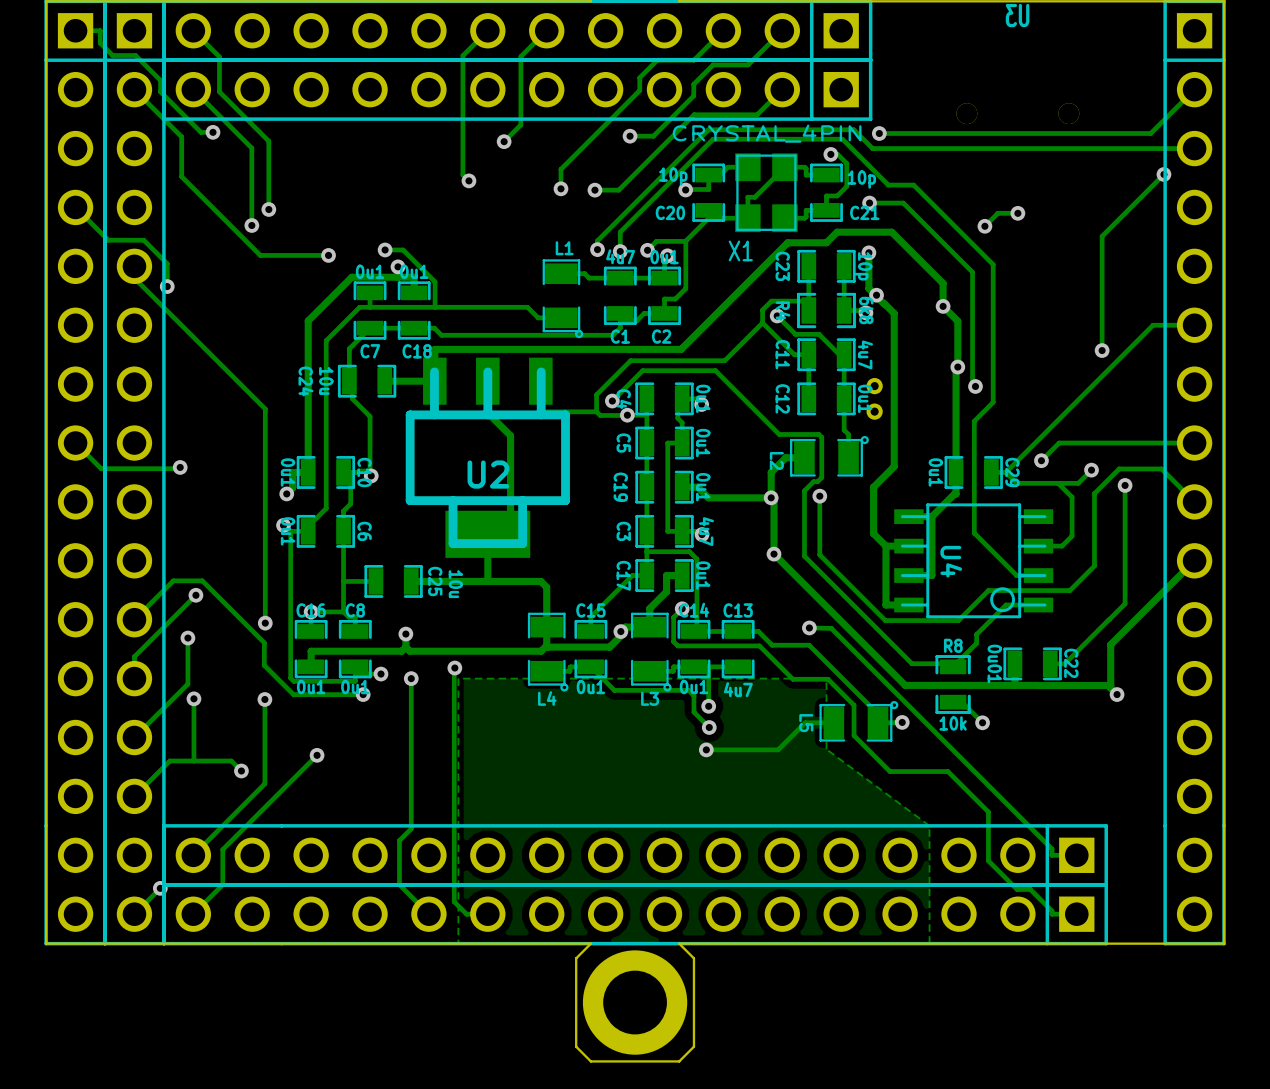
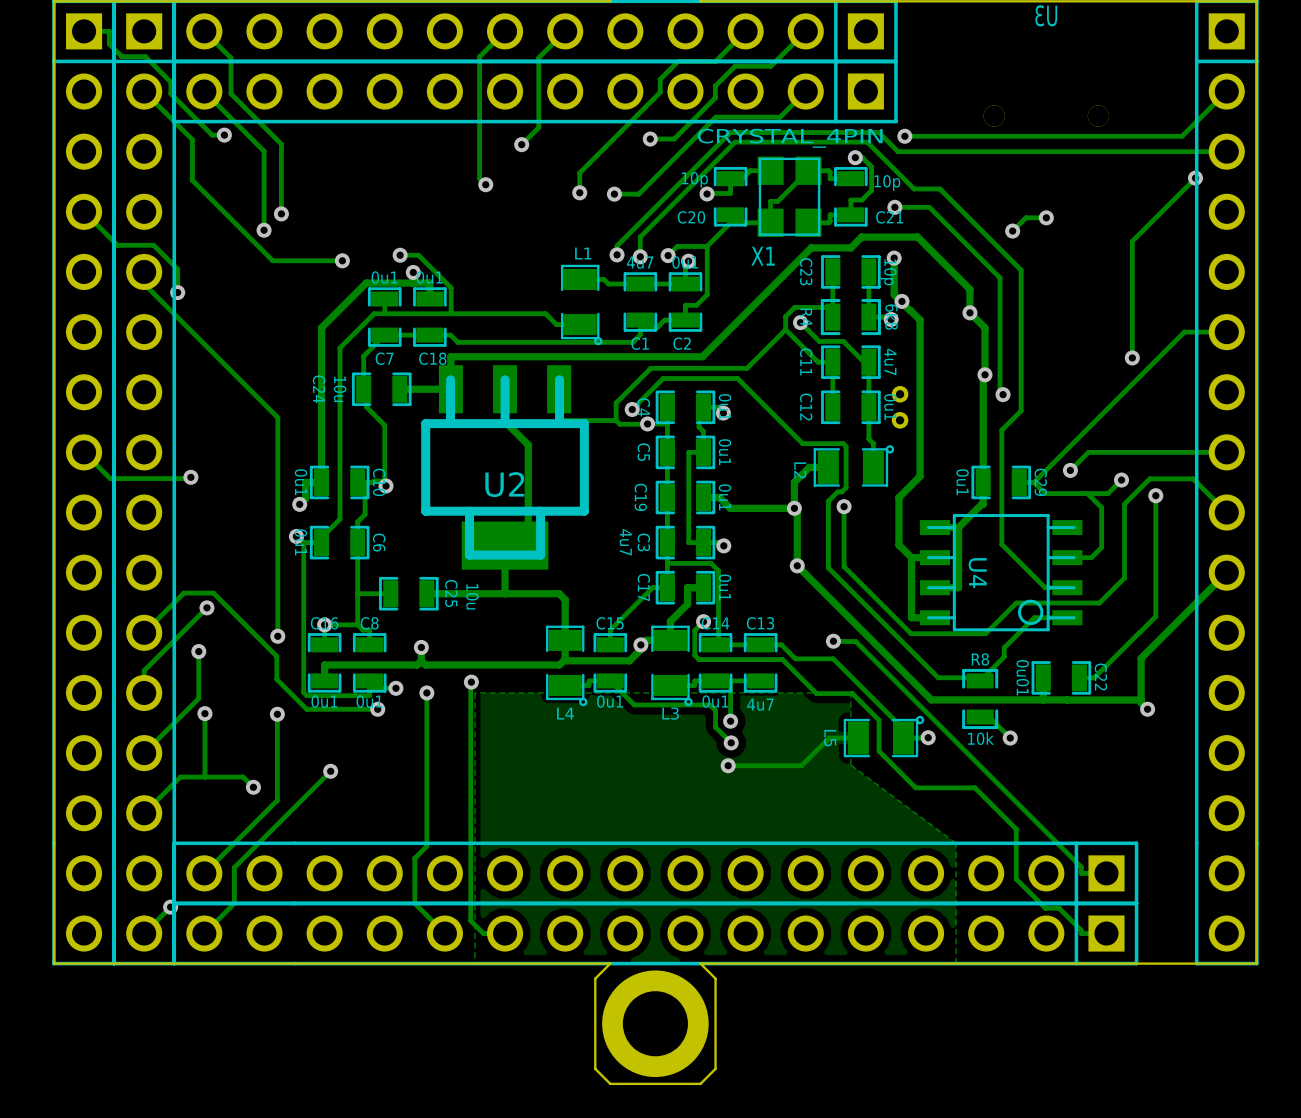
C3 value position: 4u7 (706, 531) -> 4u7 (625, 542)

